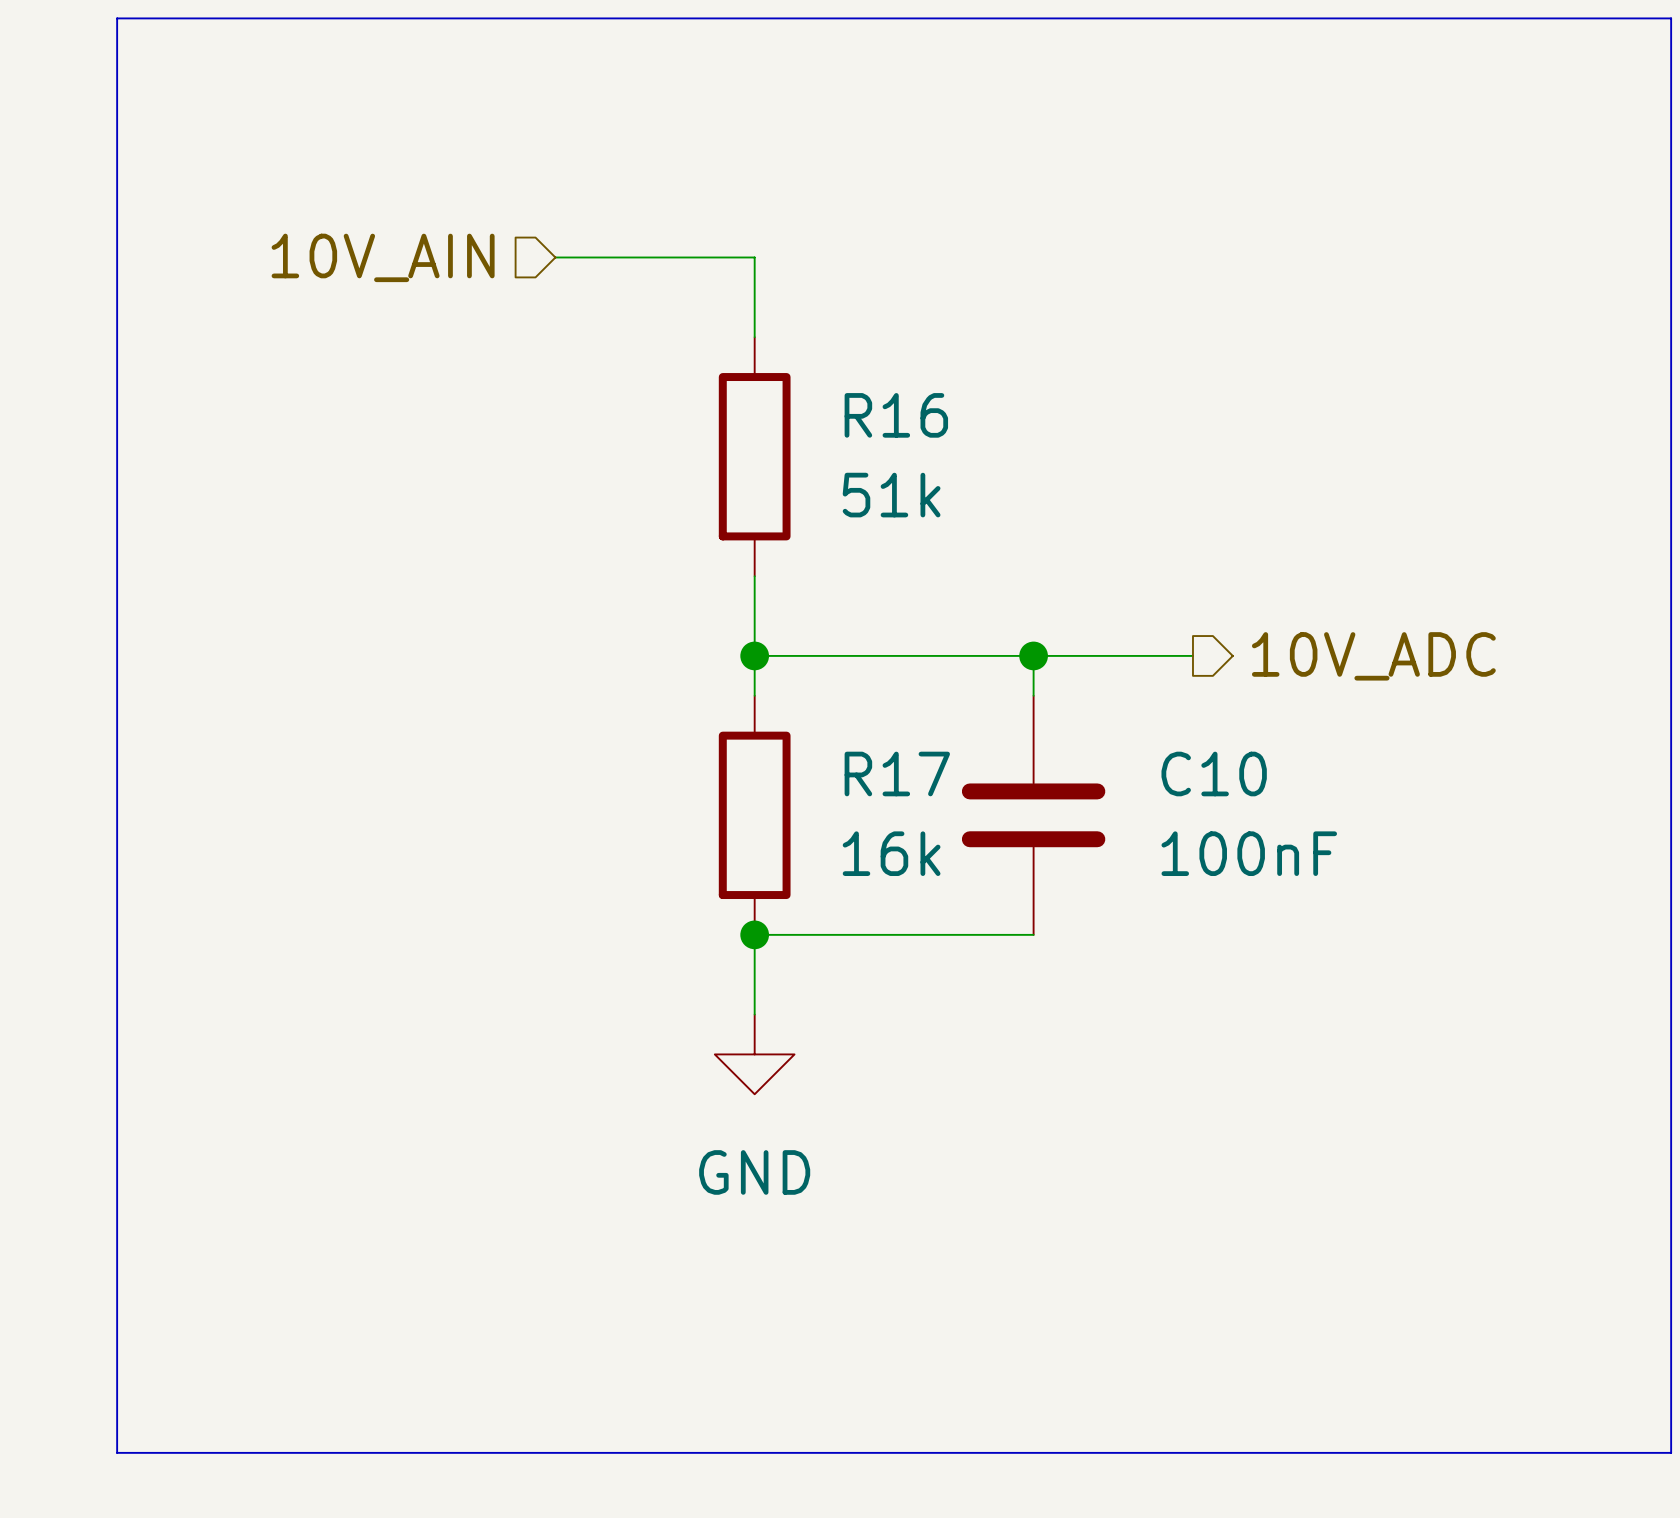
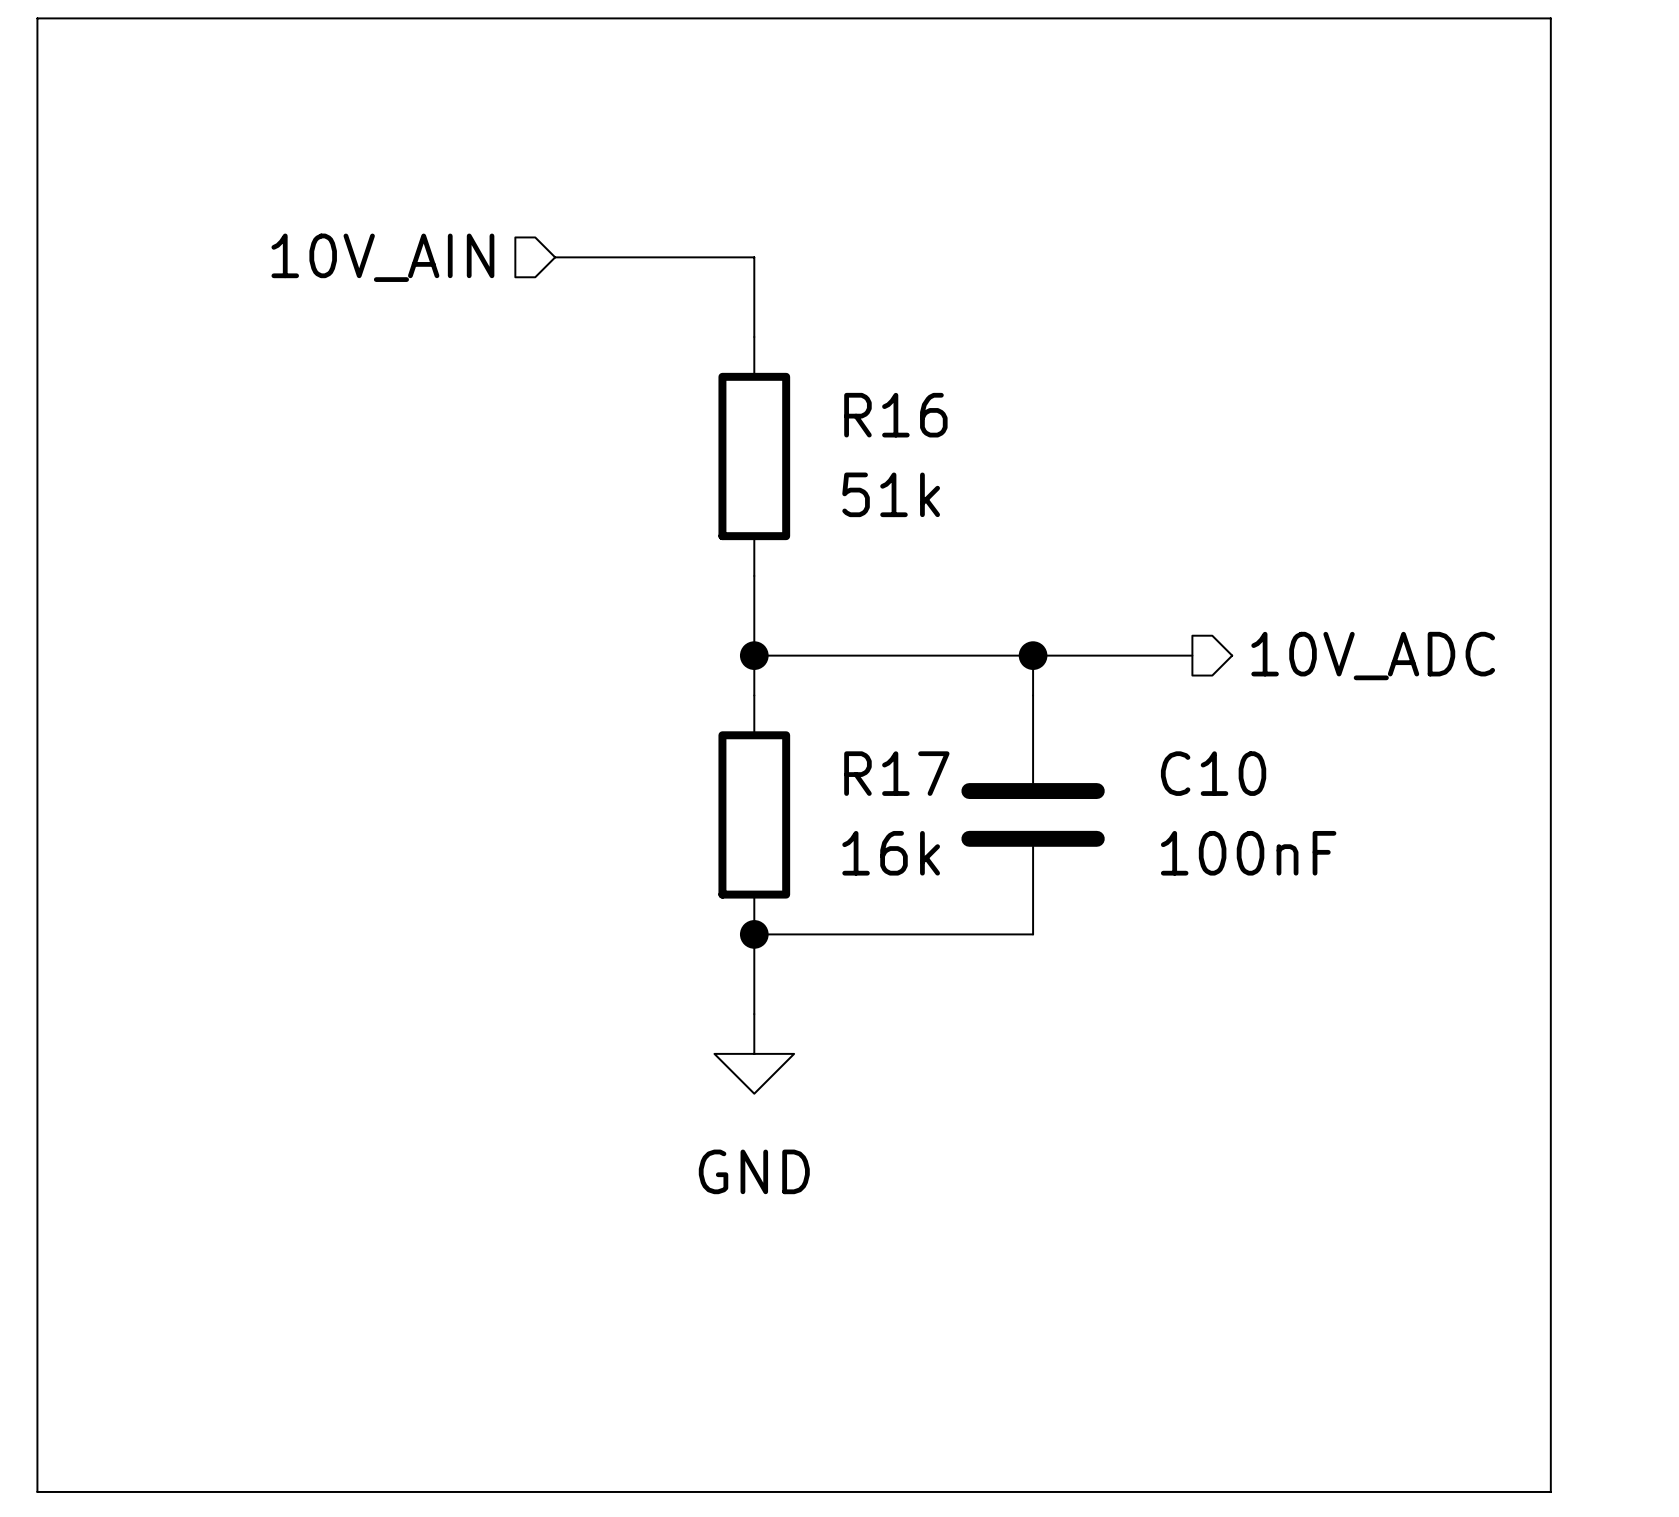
line: (117, 18) (117, 1452) (1671, 1452) (1671, 18) (1551, 18) -> (117, 18) (37, 18) (37, 1491) (1550, 1491) (1550, 18)

